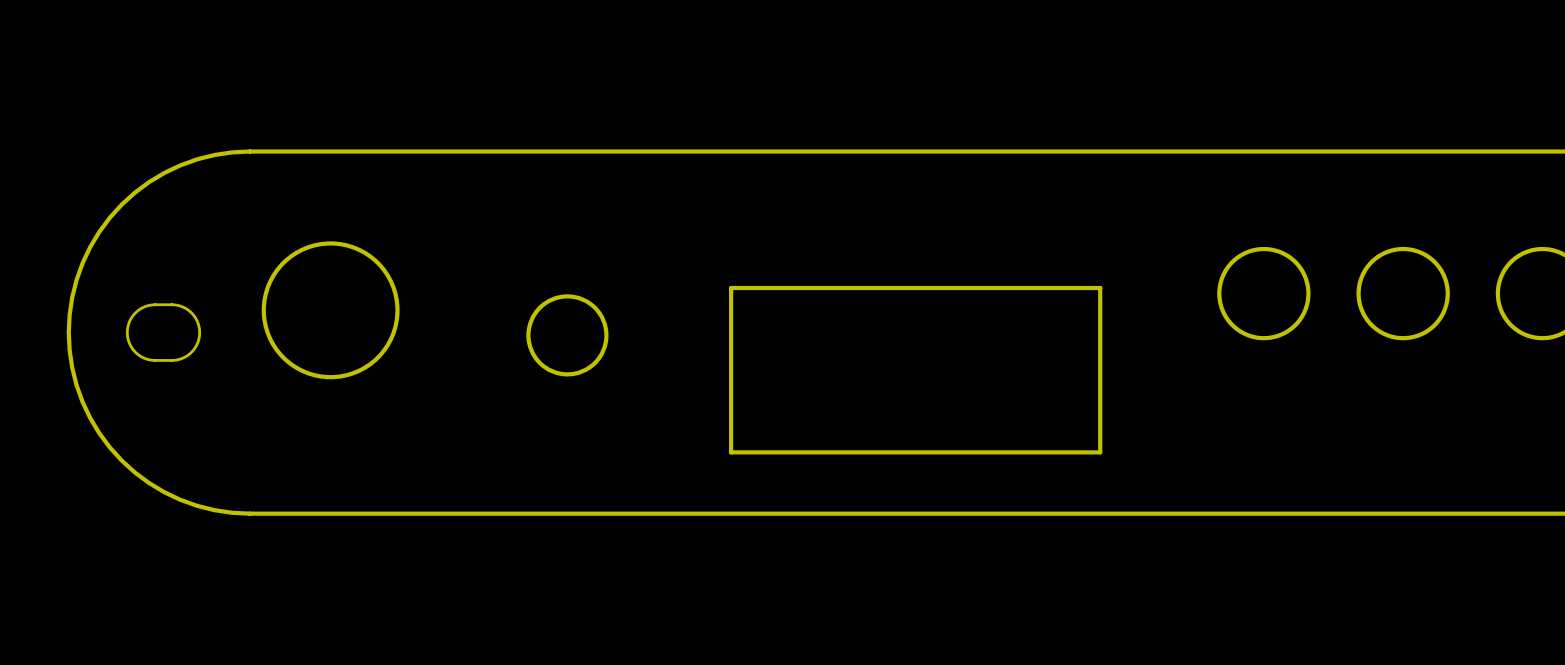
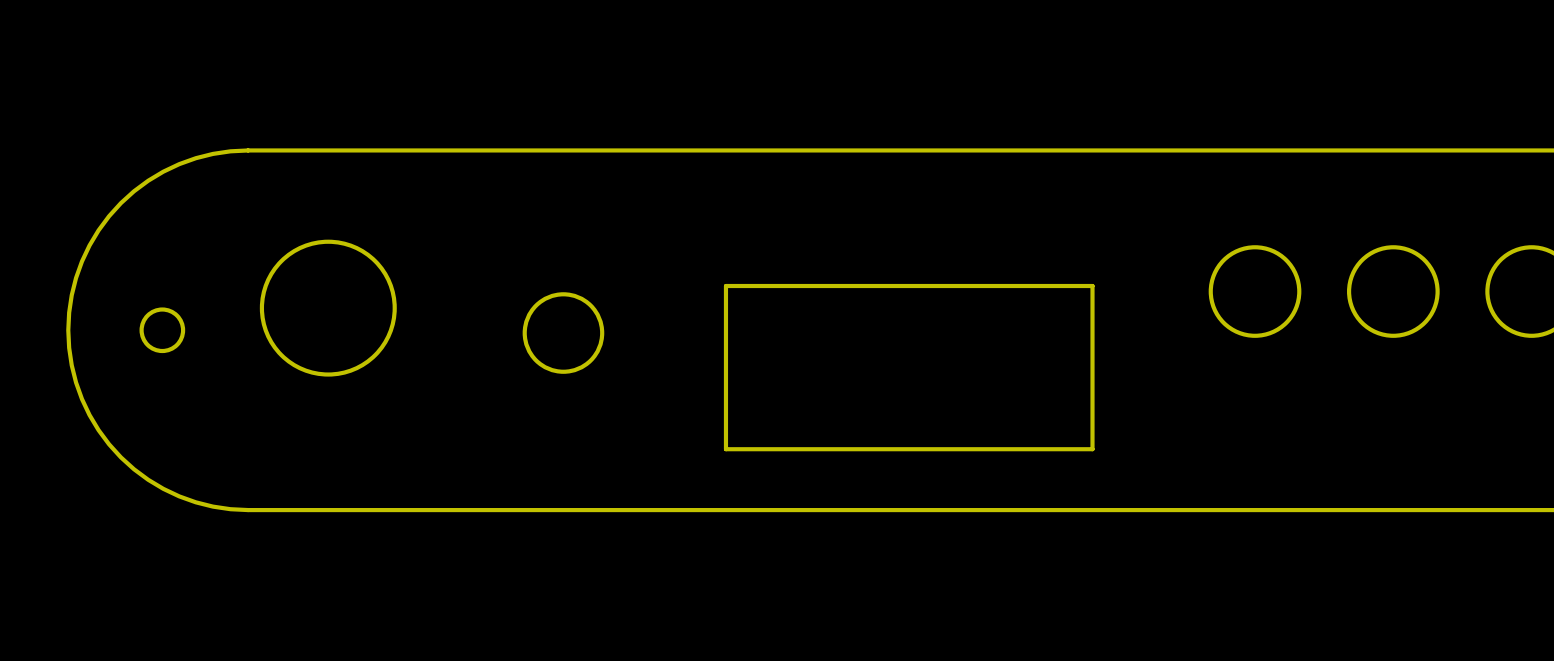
board edge: (155, 304) (181, 306) (190, 311) (196, 319) (199, 329) (198, 339) (192, 351) (184, 357) (175, 360) (147, 359) (138, 354) (131, 346) (127, 332) (131, 318) (141, 308) (155, 304) -> none
round board edge: none -> [139, 307, 186, 354]

